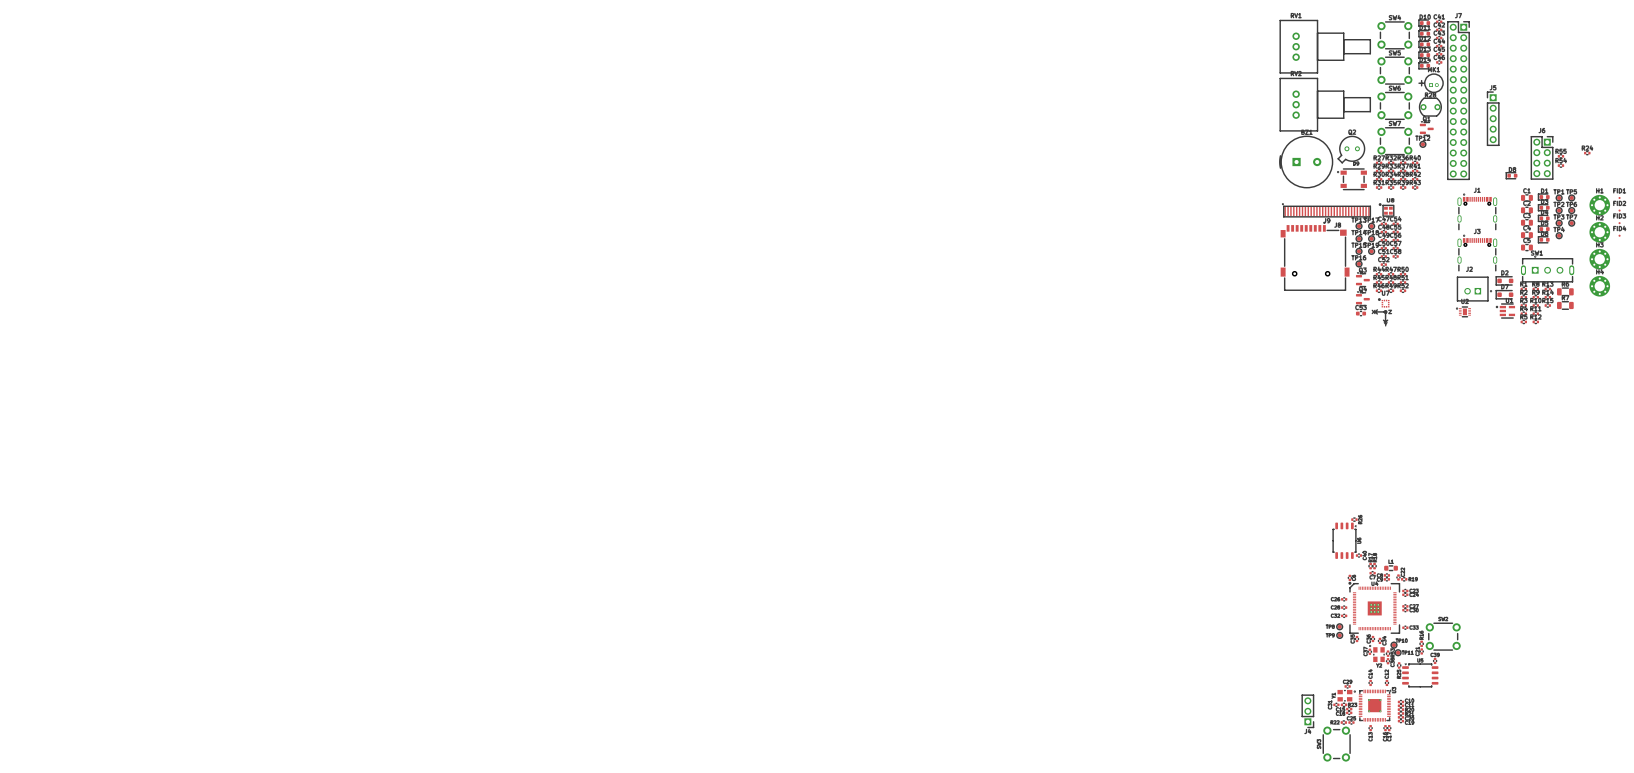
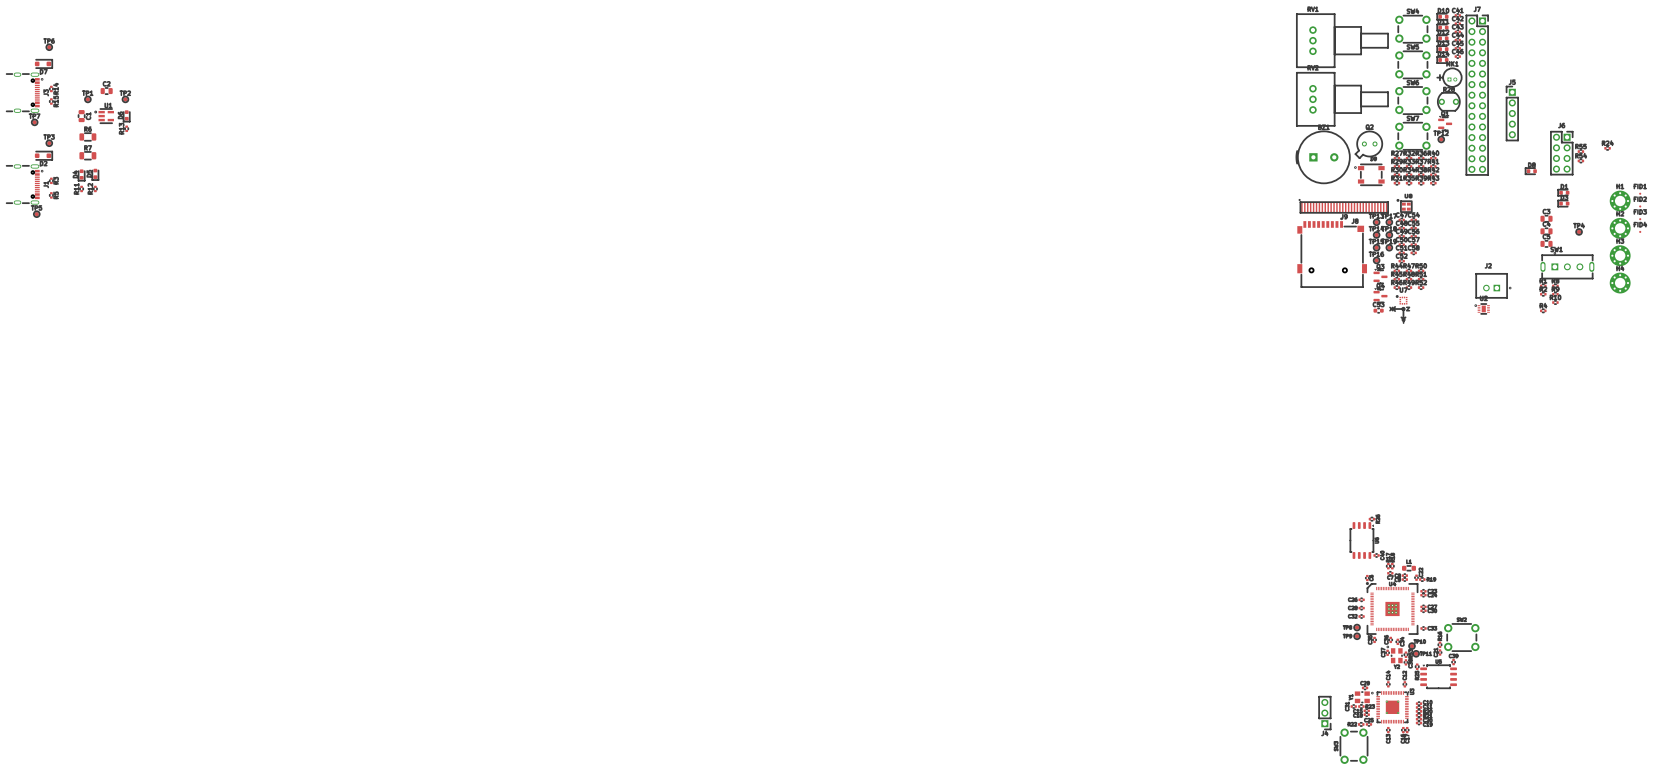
part rotation: 0° (1526, 197) -> 90° clockwise (81, 116)
part position: (1526, 197) -> (81, 116)
part position: (1559, 197) -> (87, 99)
part position: (1571, 197) -> (36, 214)
part position: (1526, 210) -> (106, 91)
part position: (1559, 210) -> (125, 99)
part position: (1571, 210) -> (49, 47)
part rotation: 0° (1477, 211) -> 90° clockwise (24, 184)
part position: (1477, 211) -> (24, 184)
part rotation: 0° (1543, 218) -> 90° counterclockwise (81, 175)
part position: (1543, 218) -> (81, 175)
part position: (1559, 223) -> (49, 143)
part position: (1571, 223) -> (34, 122)
part rotation: 0° (1543, 229) -> 90° counterclockwise (95, 174)
part position: (1543, 229) -> (95, 174)
part rotation: 0° (1543, 239) -> 90° counterclockwise (126, 116)
part position: (1543, 239) -> (126, 116)
part rotation: 0° (1477, 252) -> 90° clockwise (24, 92)
part position: (1477, 252) -> (24, 92)
part rotation: 0° (1504, 280) -> 180° (43, 155)
part position: (1504, 280) -> (43, 155)
part rotation: 0° (1547, 289) -> 90° clockwise (126, 128)
part position: (1547, 289) -> (126, 128)
part position: (1565, 291) -> (87, 136)
part rotation: 0° (1504, 294) -> 180° (43, 63)
part position: (1504, 294) -> (43, 63)
part rotation: 0° (1547, 297) -> 90° clockwise (51, 88)
part position: (1547, 297) -> (51, 88)
part rotation: 0° (1523, 305) -> 90° clockwise (51, 180)
part position: (1523, 305) -> (51, 180)
part rotation: 0° (1547, 305) -> 90° clockwise (51, 101)
part position: (1547, 305) -> (51, 101)
part position: (1565, 305) -> (87, 155)
part position: (1505, 311) -> (104, 116)
part rotation: 0° (1535, 313) -> 90° clockwise (81, 188)
part position: (1535, 313) -> (81, 188)
part rotation: 0° (1523, 321) -> 90° clockwise (51, 195)
part position: (1523, 321) -> (51, 195)
part rotation: 0° (1535, 321) -> 90° clockwise (95, 188)
part position: (1535, 321) -> (95, 188)

